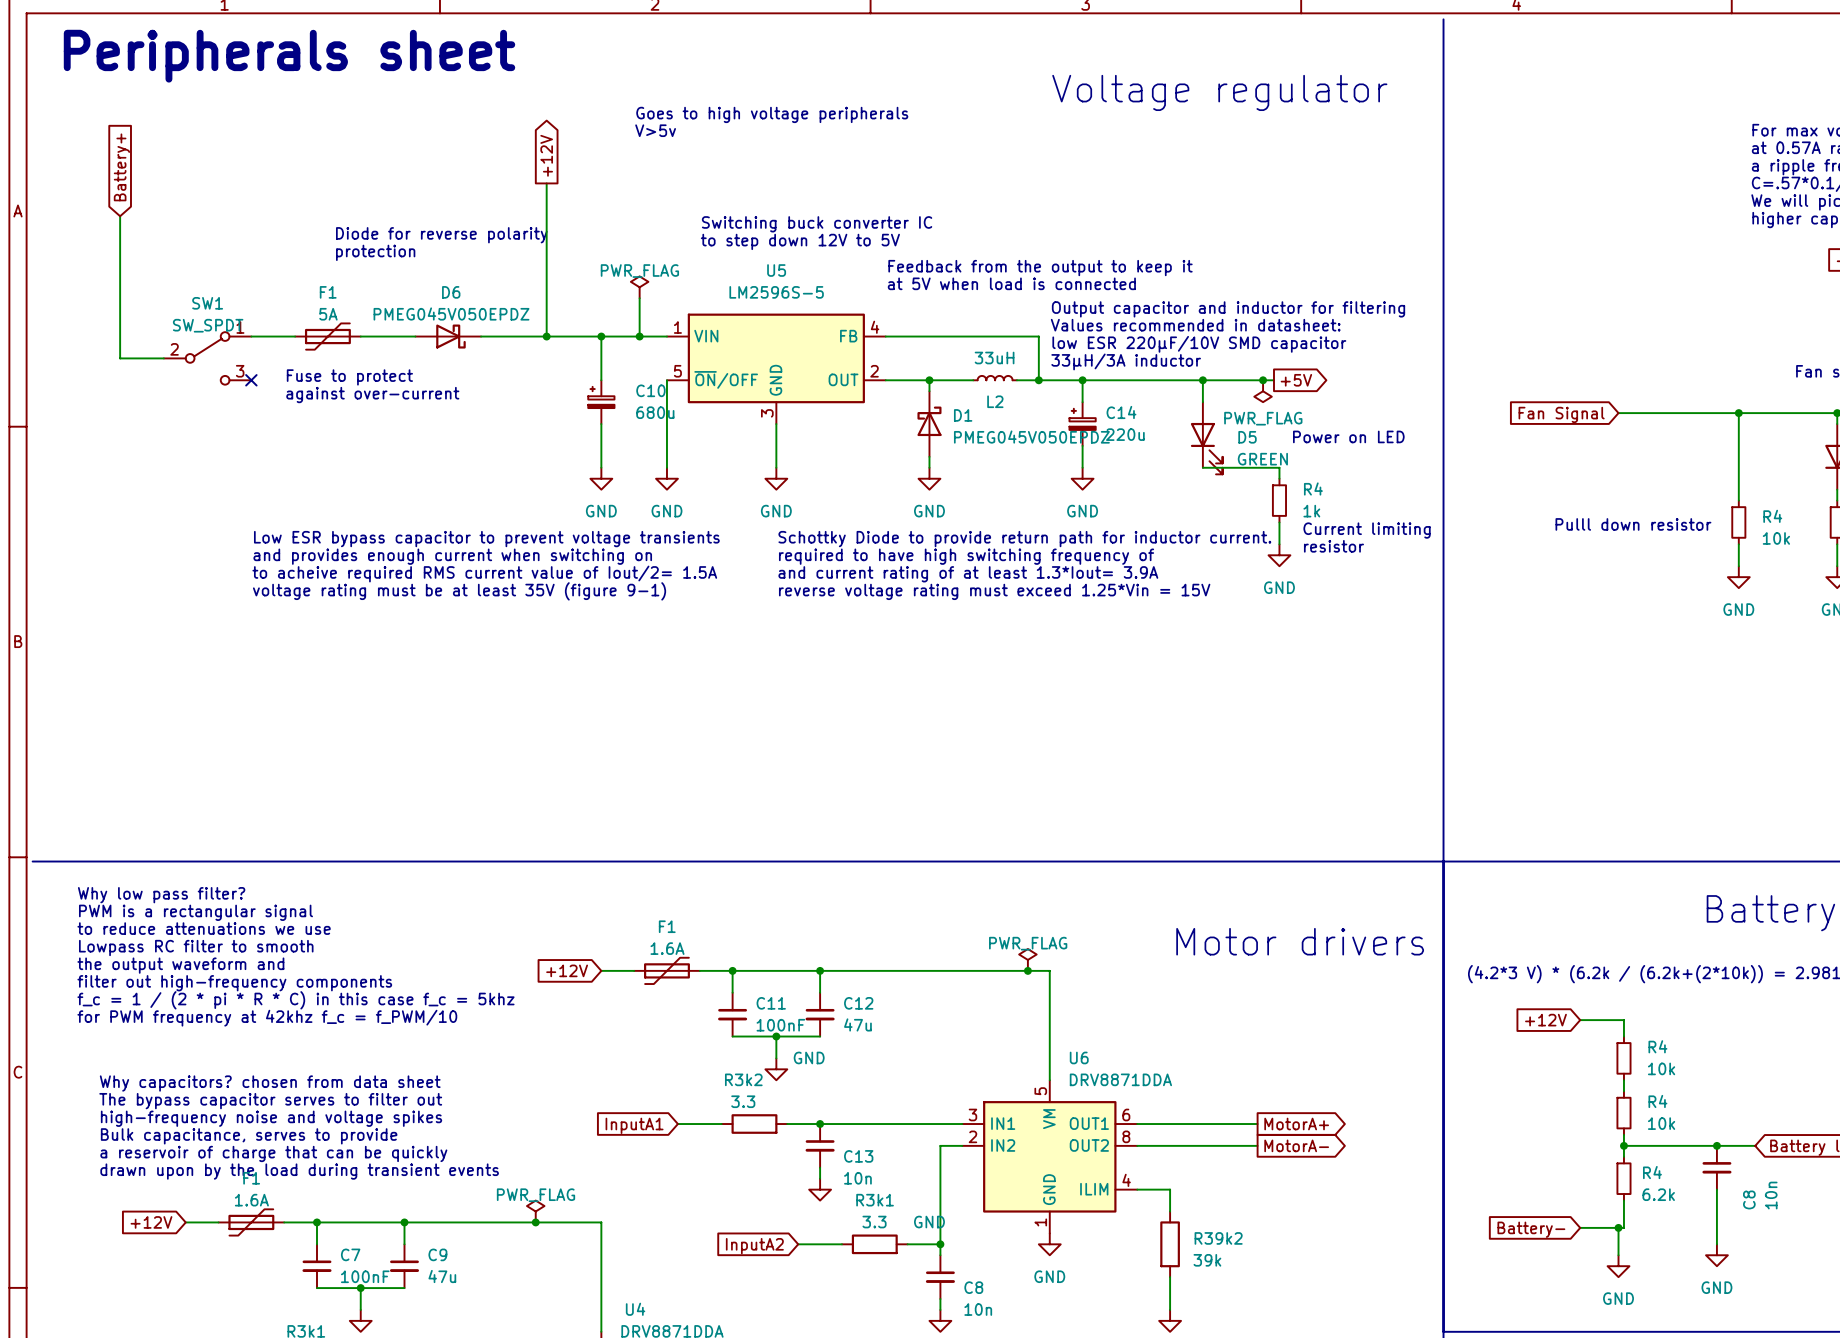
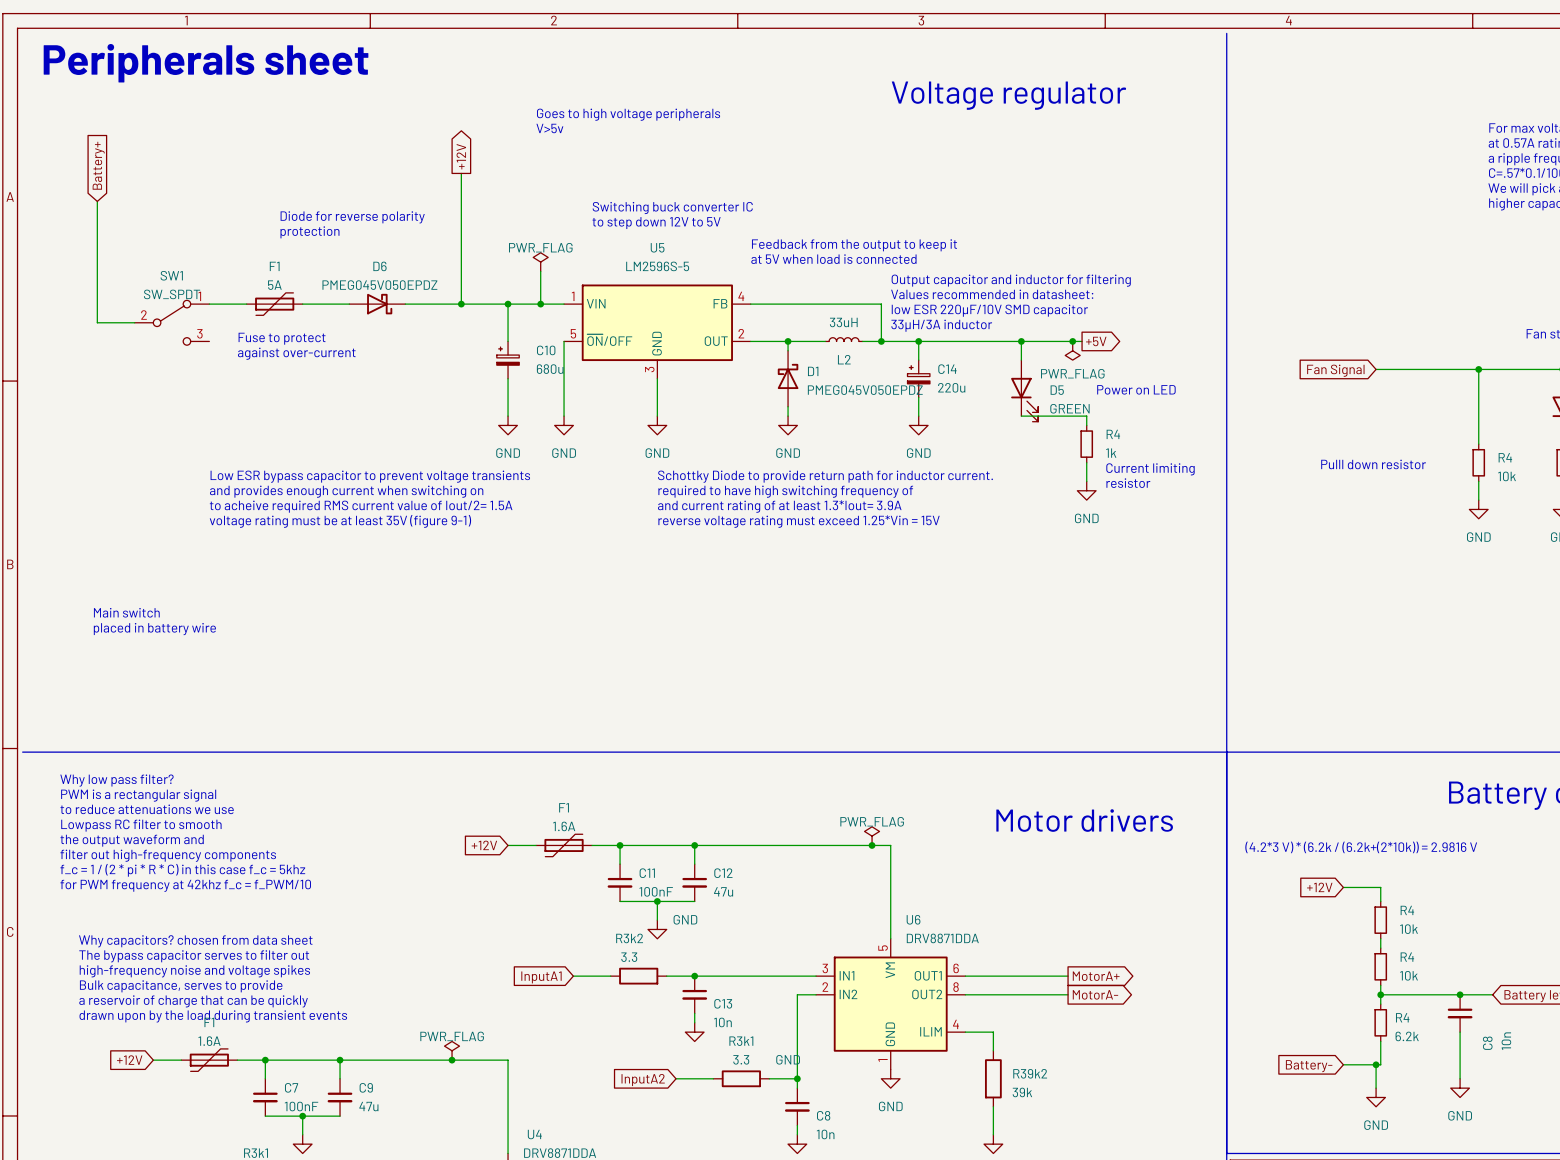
no-connect mark: (251, 380) -> none
text: none -> Main switch (126, 612)
text: none -> placed in battery wire (154, 629)

